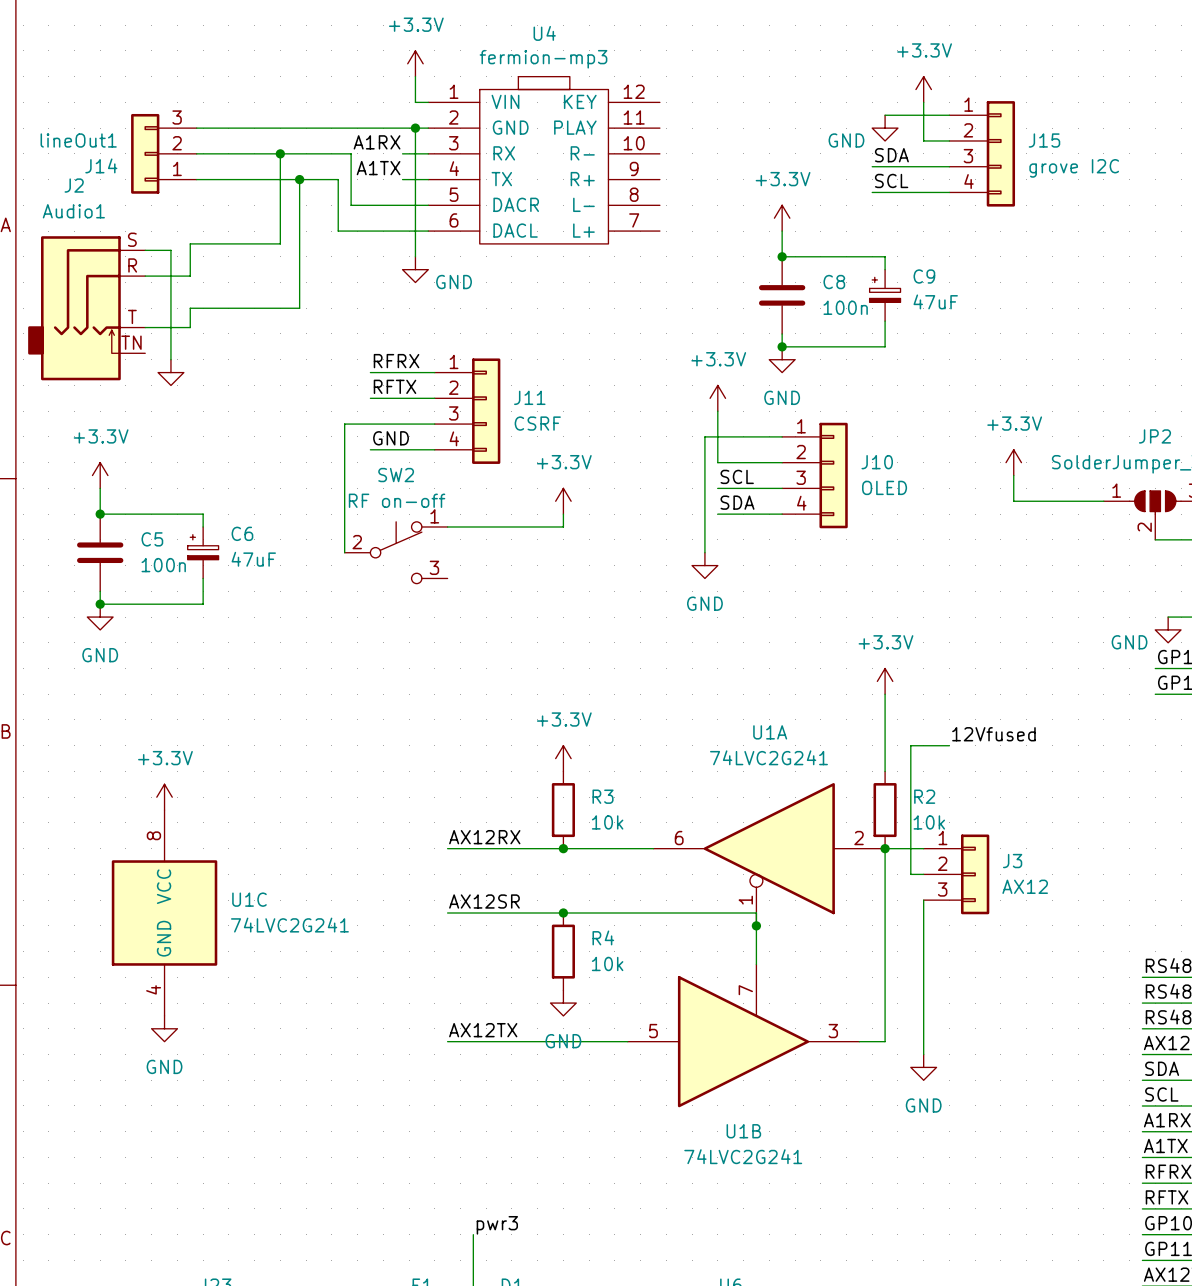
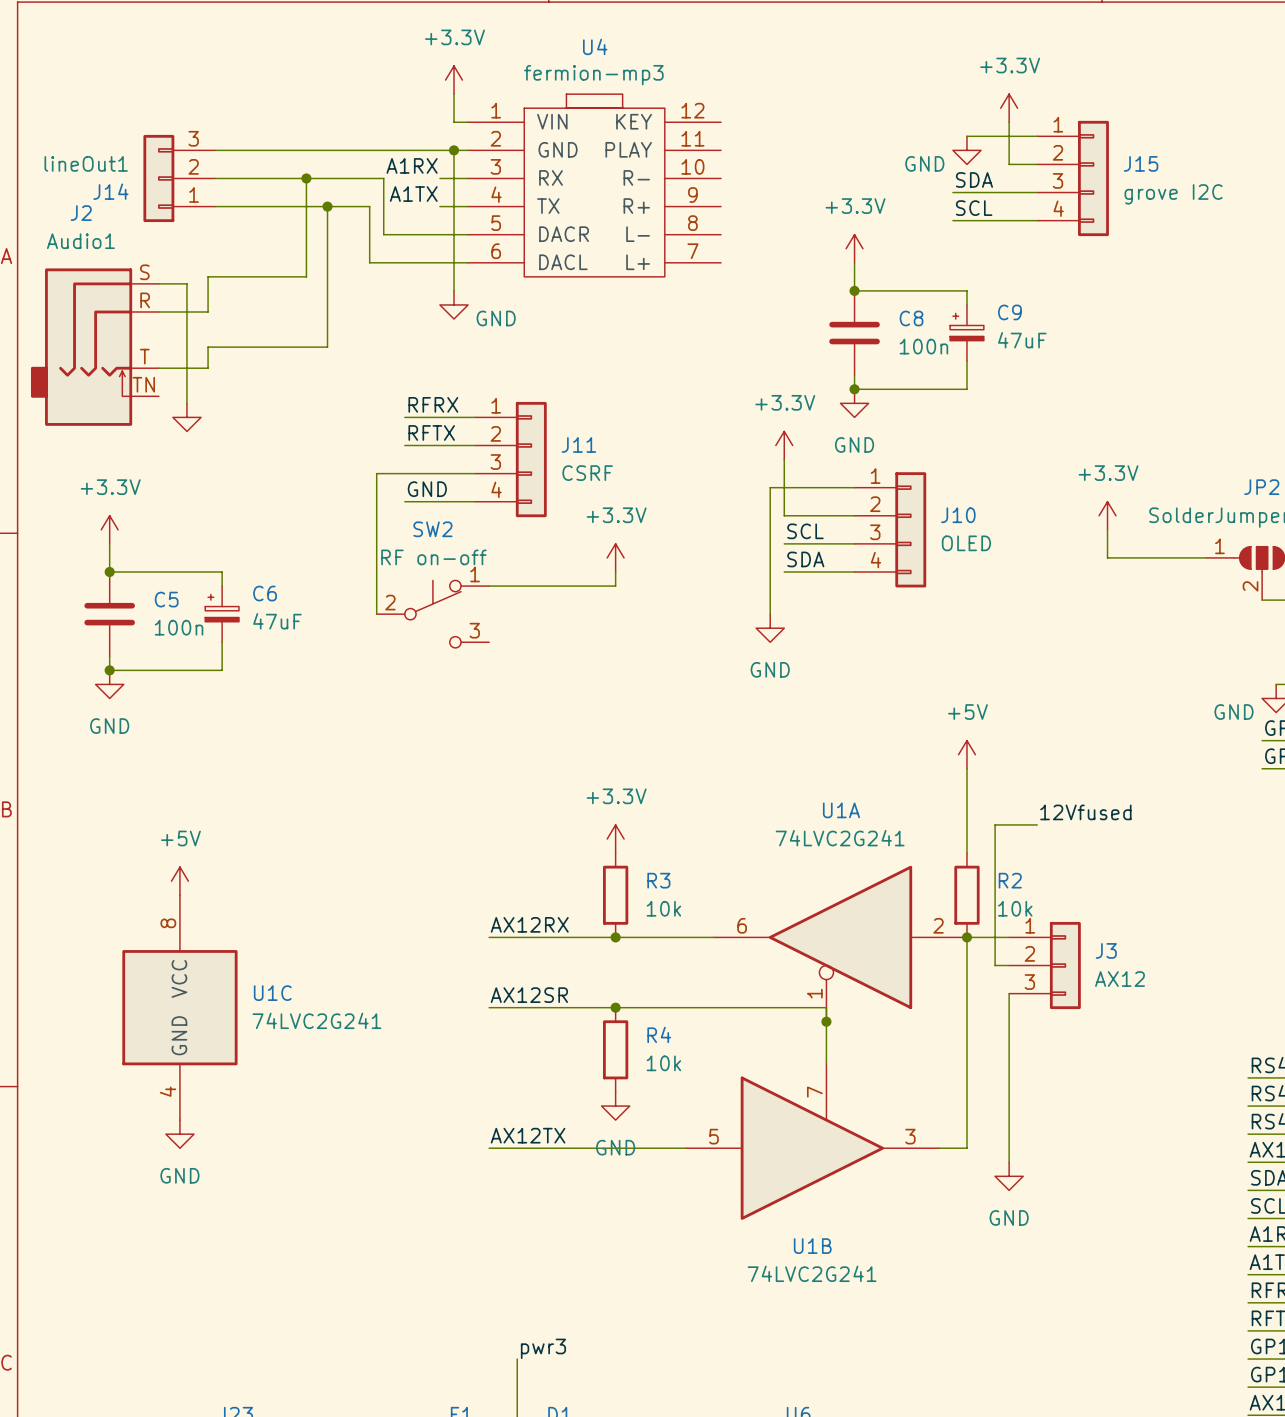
power symbol: +3.3V (885, 681) -> +5V (966, 754)
power symbol: +3.3V (164, 797) -> +5V (179, 881)

